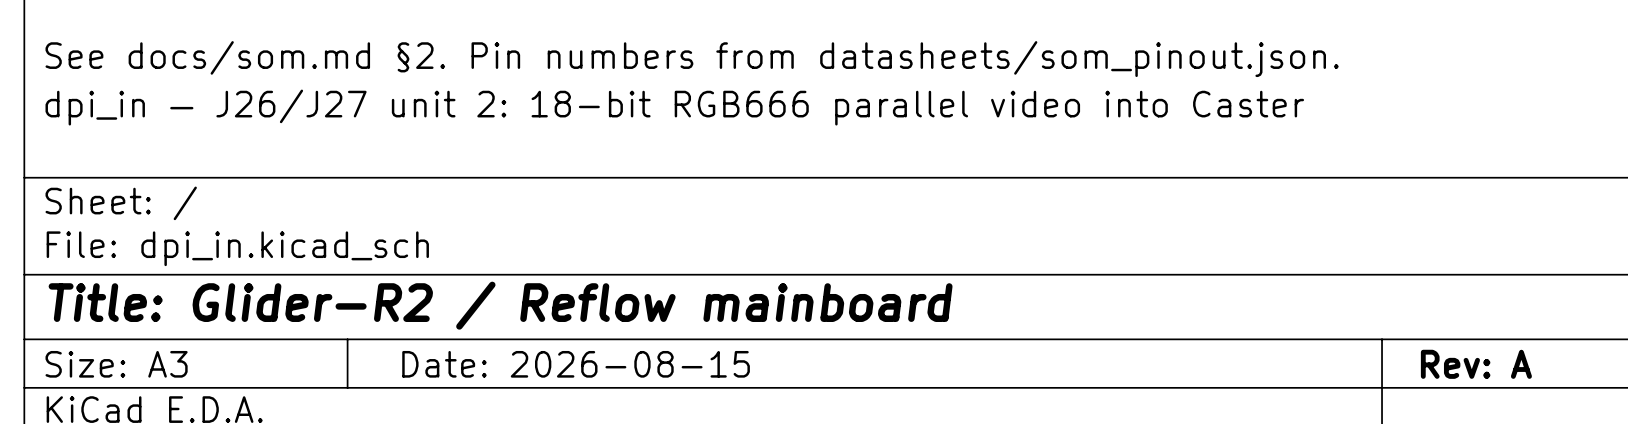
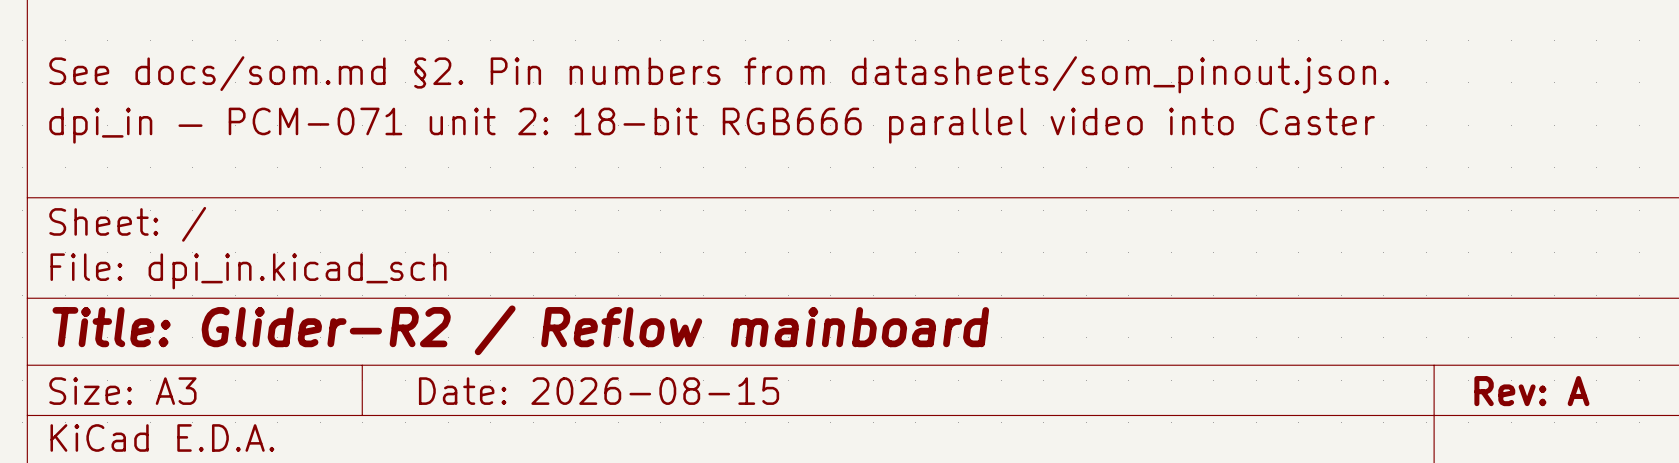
title block: dpi_in — J26/J27 unit 2: 18-bit RGB666 parallel video into Caster (674, 107) -> dpi_in — PCM-071 unit 2: 18-bit RGB666 parallel video into Caster (712, 125)

